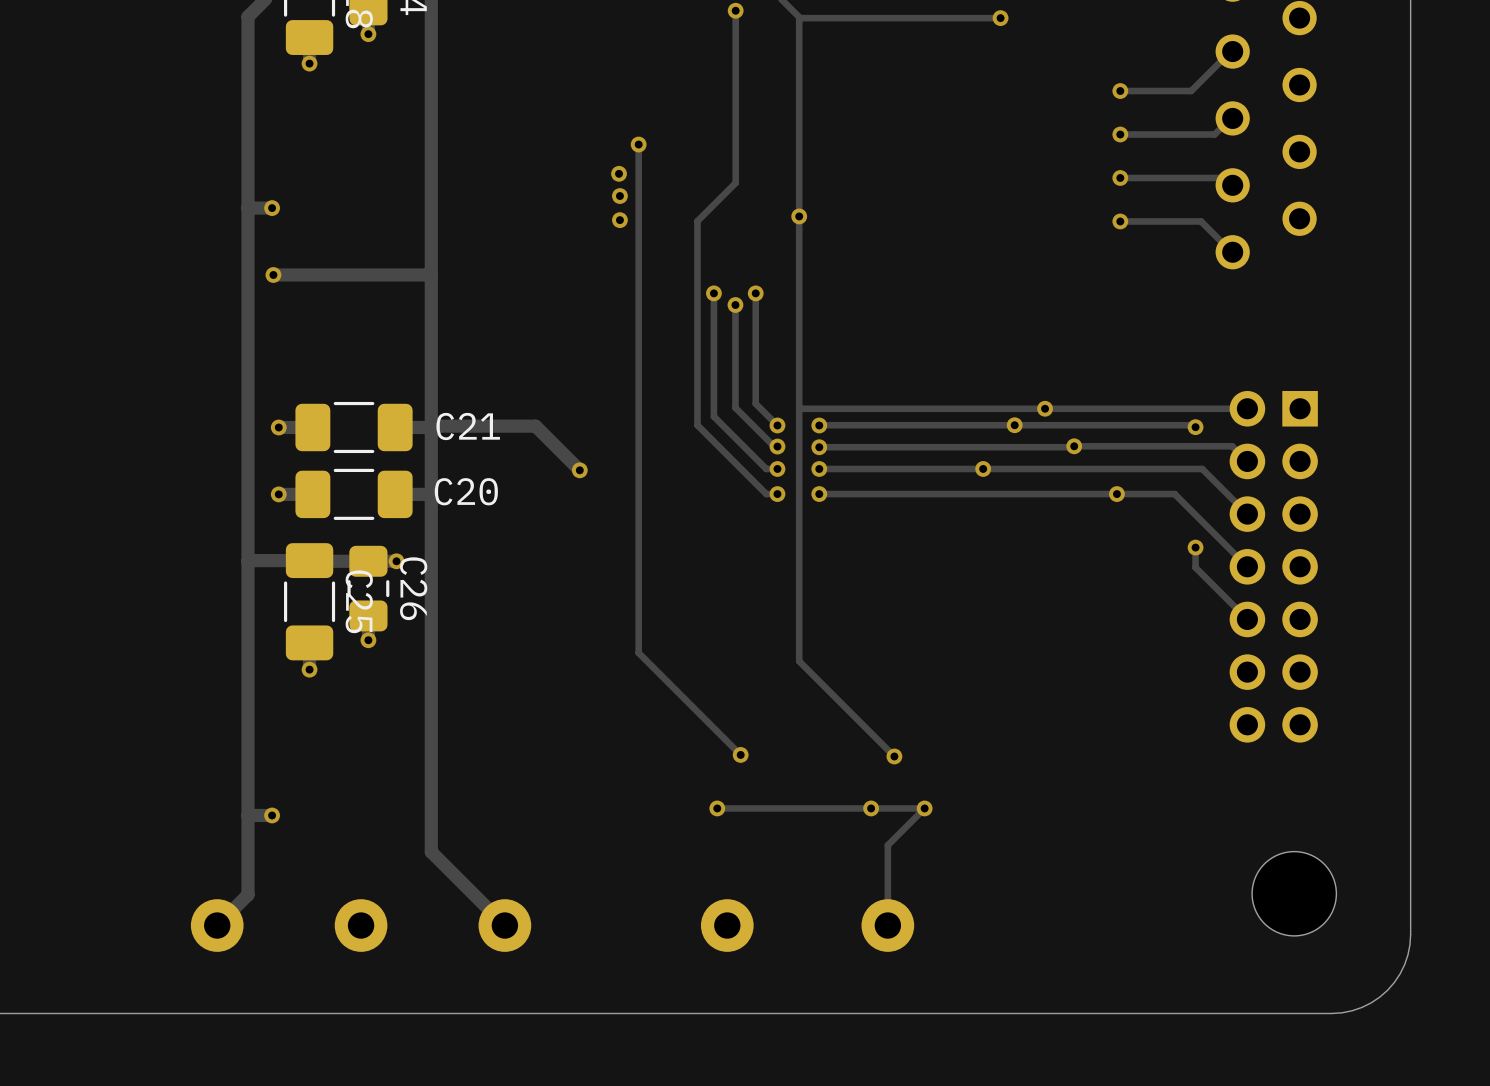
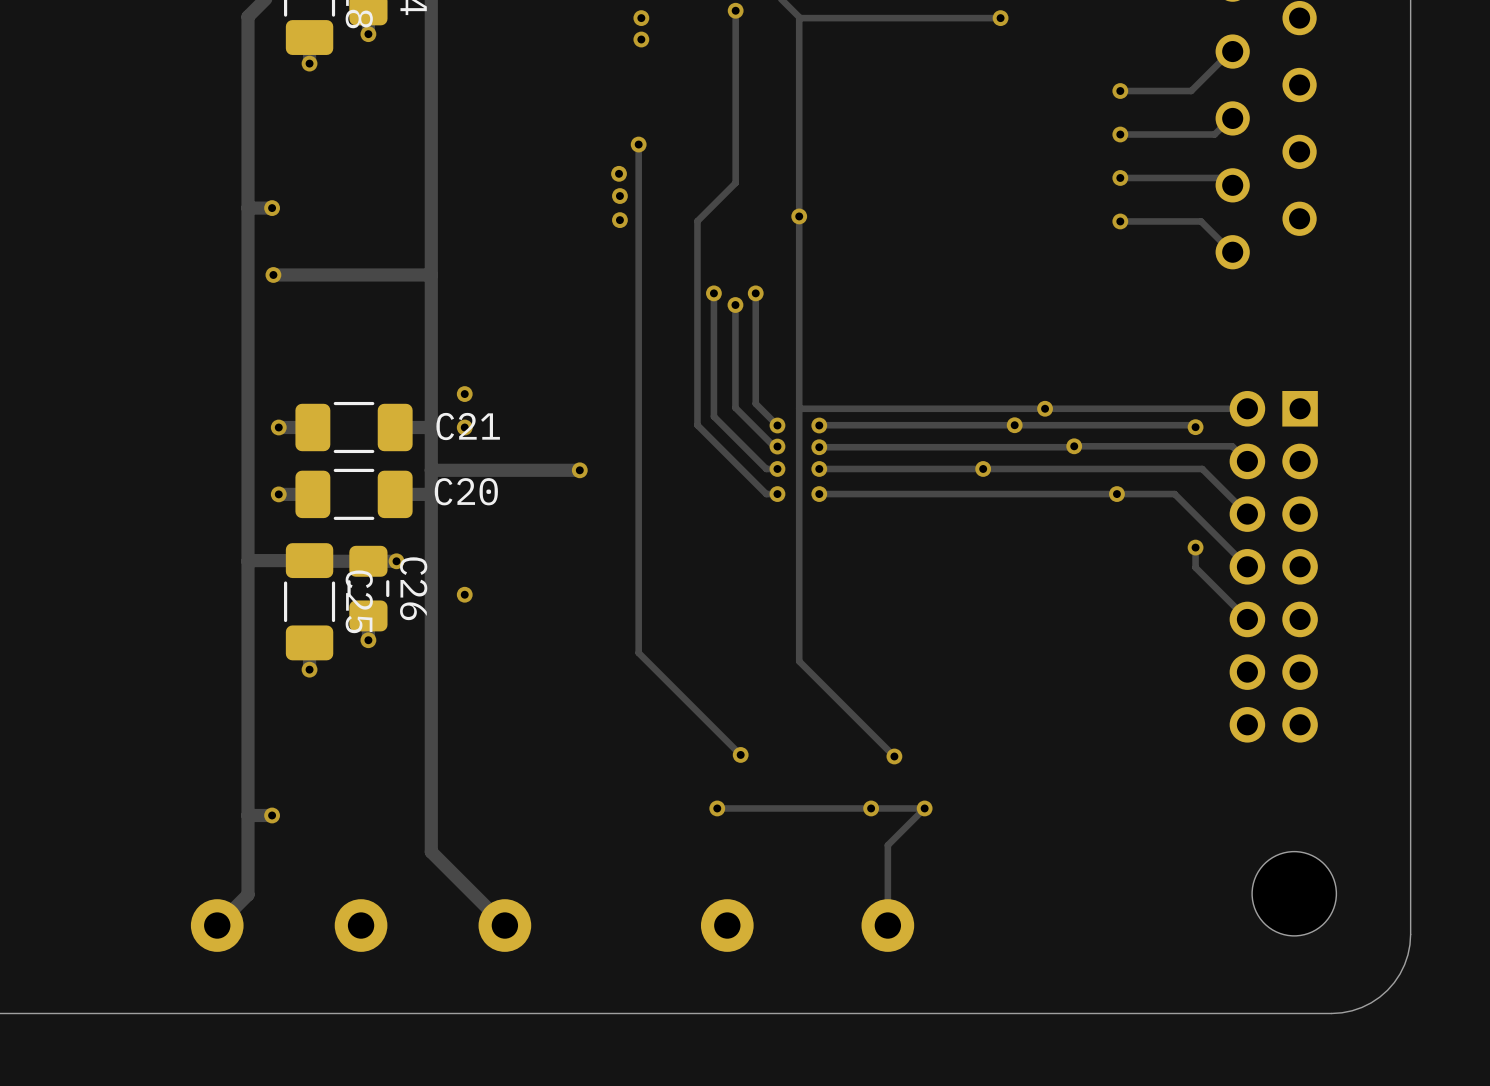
via: none -> (641, 18)
via: none -> (641, 39)
via: none -> (464, 394)
track: (431, 426) (535, 426) (579, 470) -> (431, 470) (579, 470)
via: none -> (464, 427)
via: none -> (464, 594)

